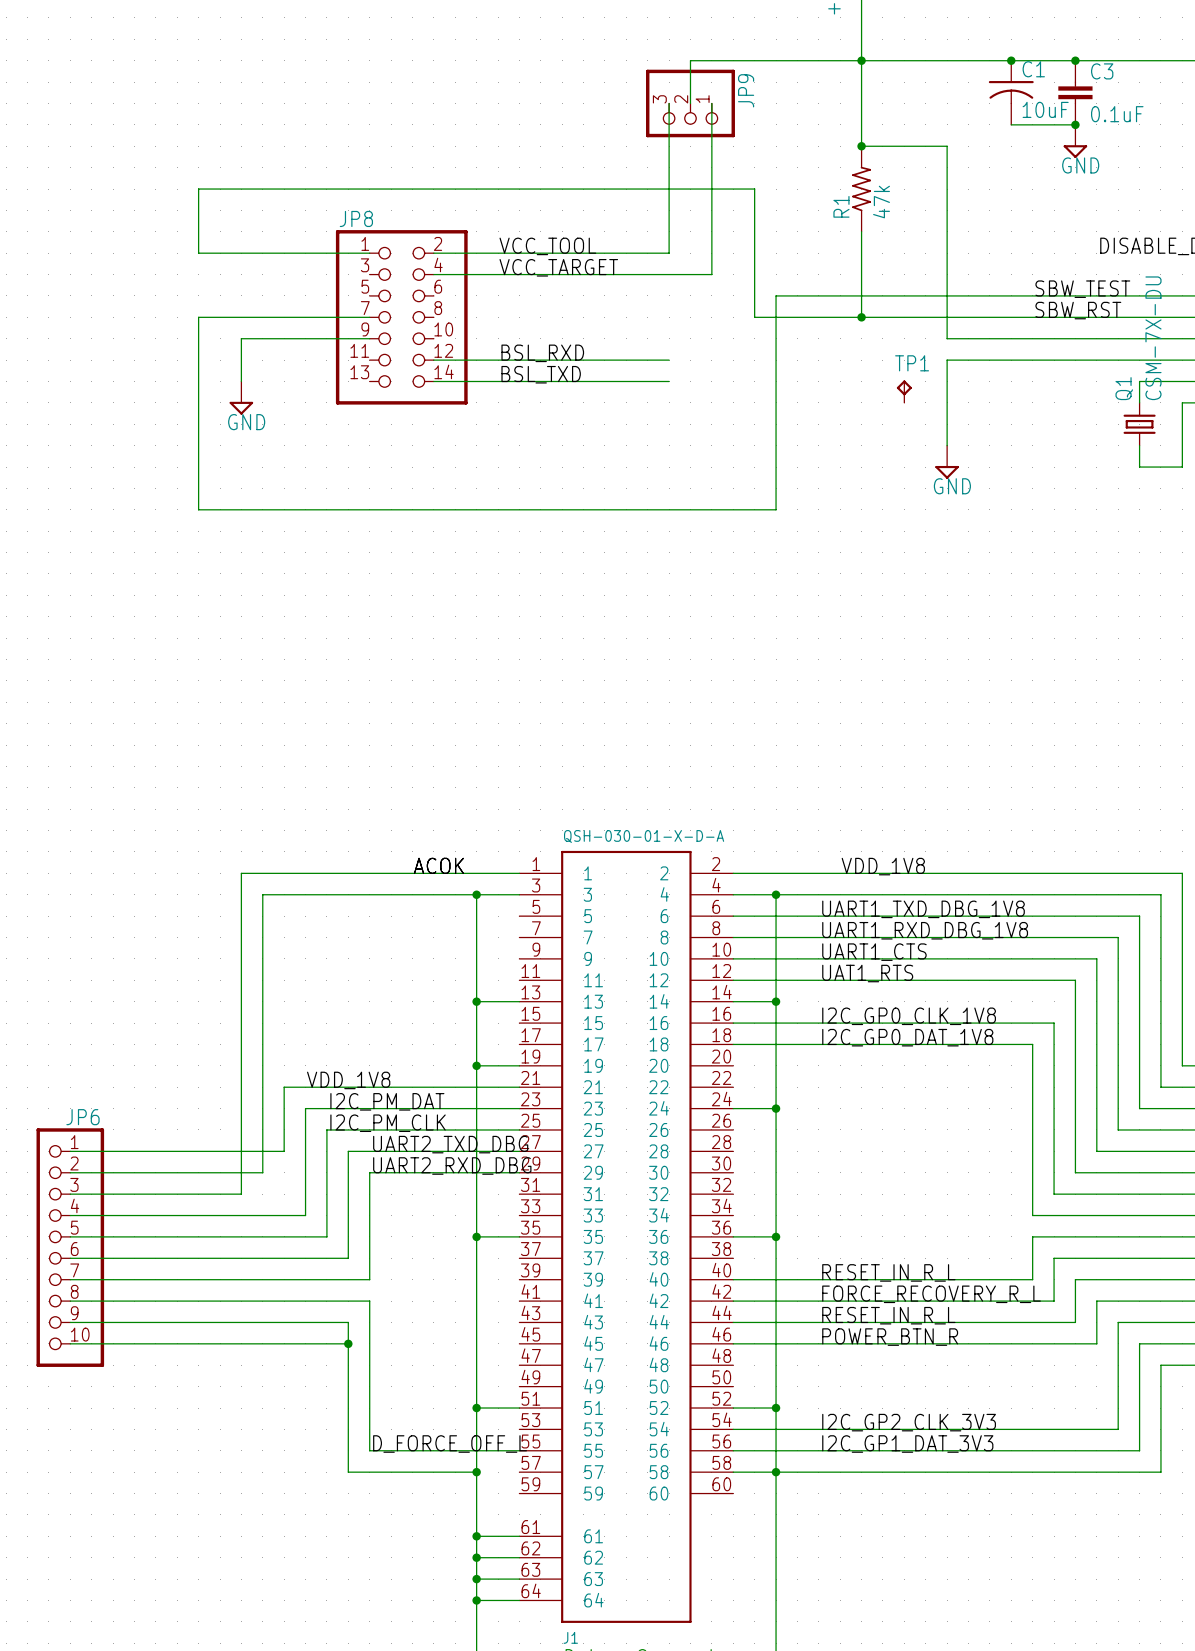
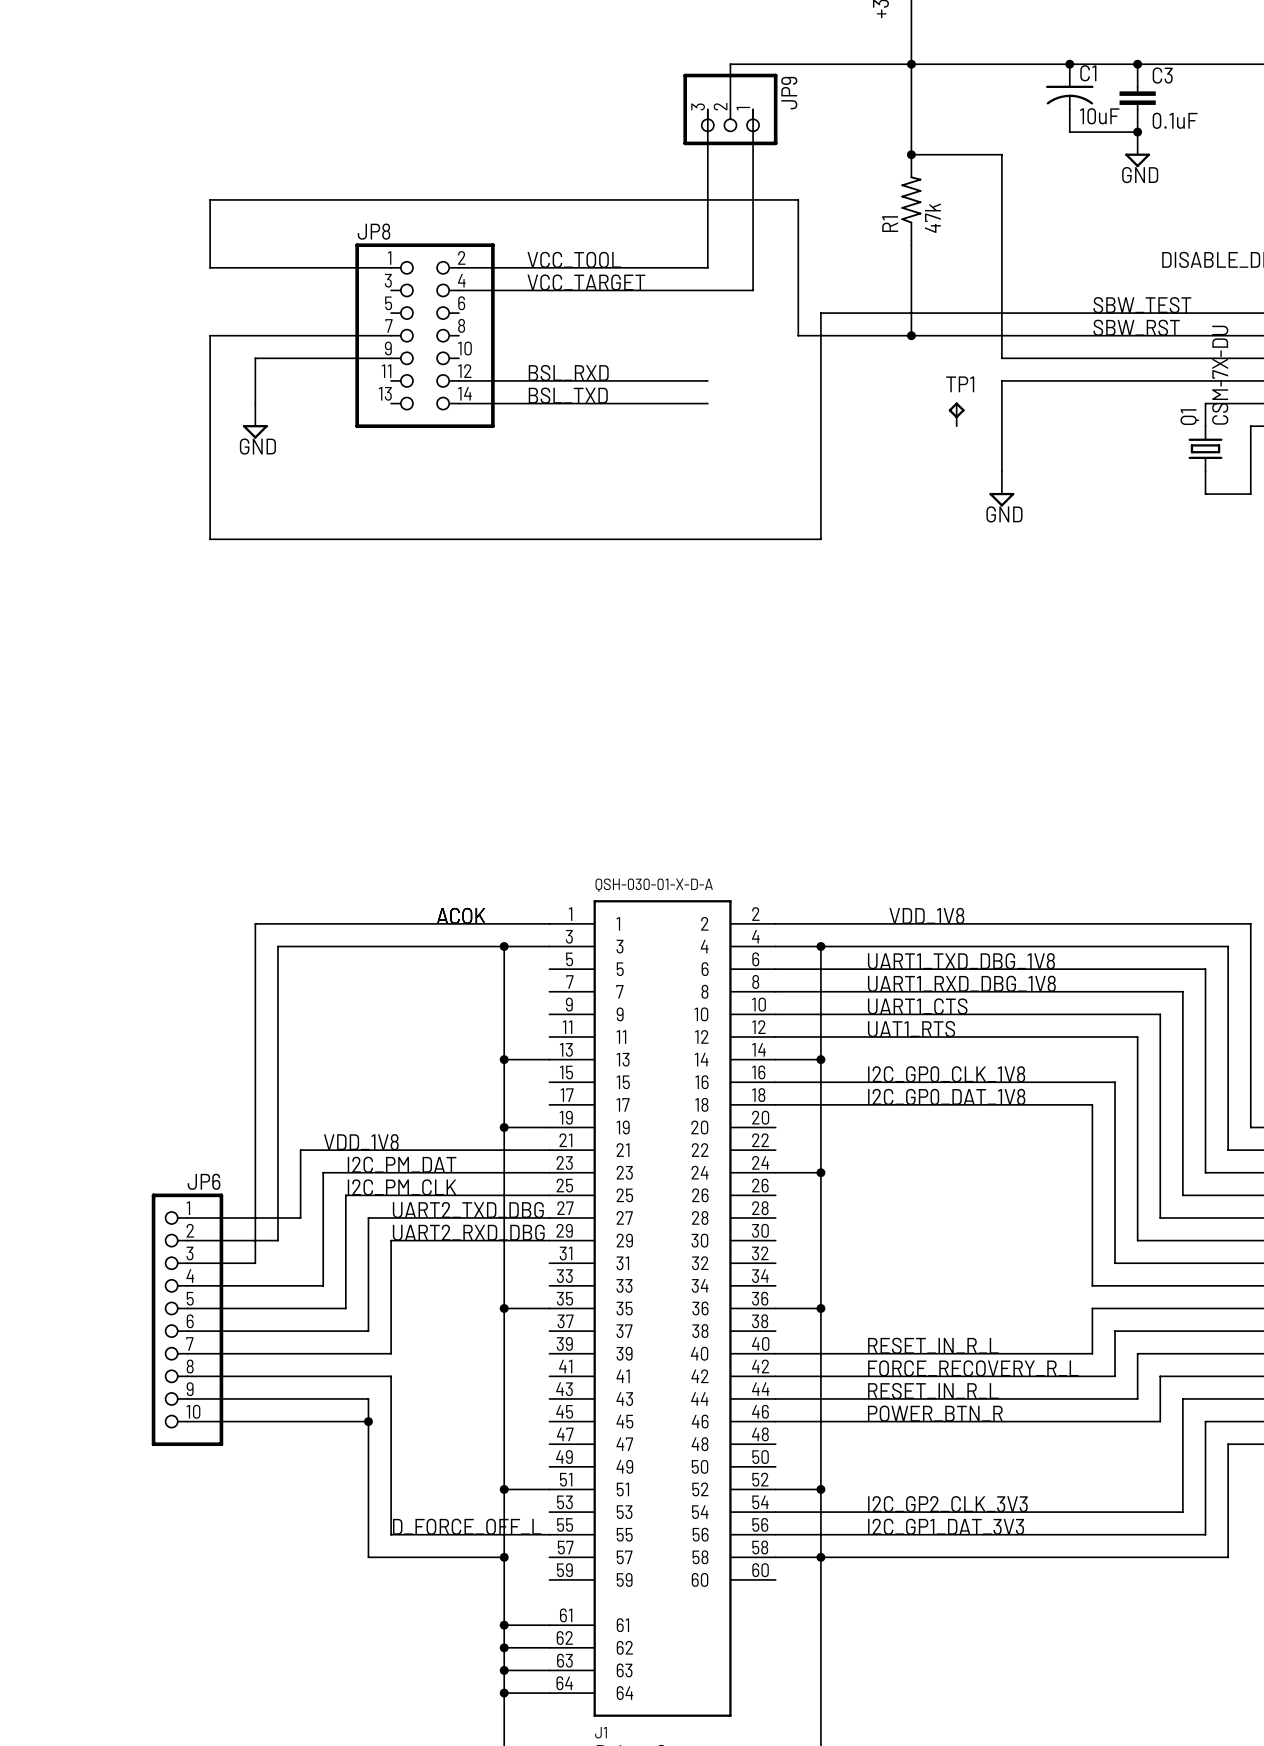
wire: (70, 1151) (177, 1151) -> none
wire: (70, 1172) (177, 1172) -> none
wire: (70, 1194) (177, 1194) -> none
wire: (70, 1215) (177, 1215) -> none
wire: (70, 1236) (177, 1236) -> none
JP6 position: (70, 1247) -> (187, 1319)
wire: (70, 1258) (177, 1258) -> none
wire: (70, 1279) (177, 1279) -> none
wire: (70, 1301) (177, 1301) -> none
wire: (70, 1322) (177, 1322) -> none
wire: (70, 1343) (177, 1343) -> none

